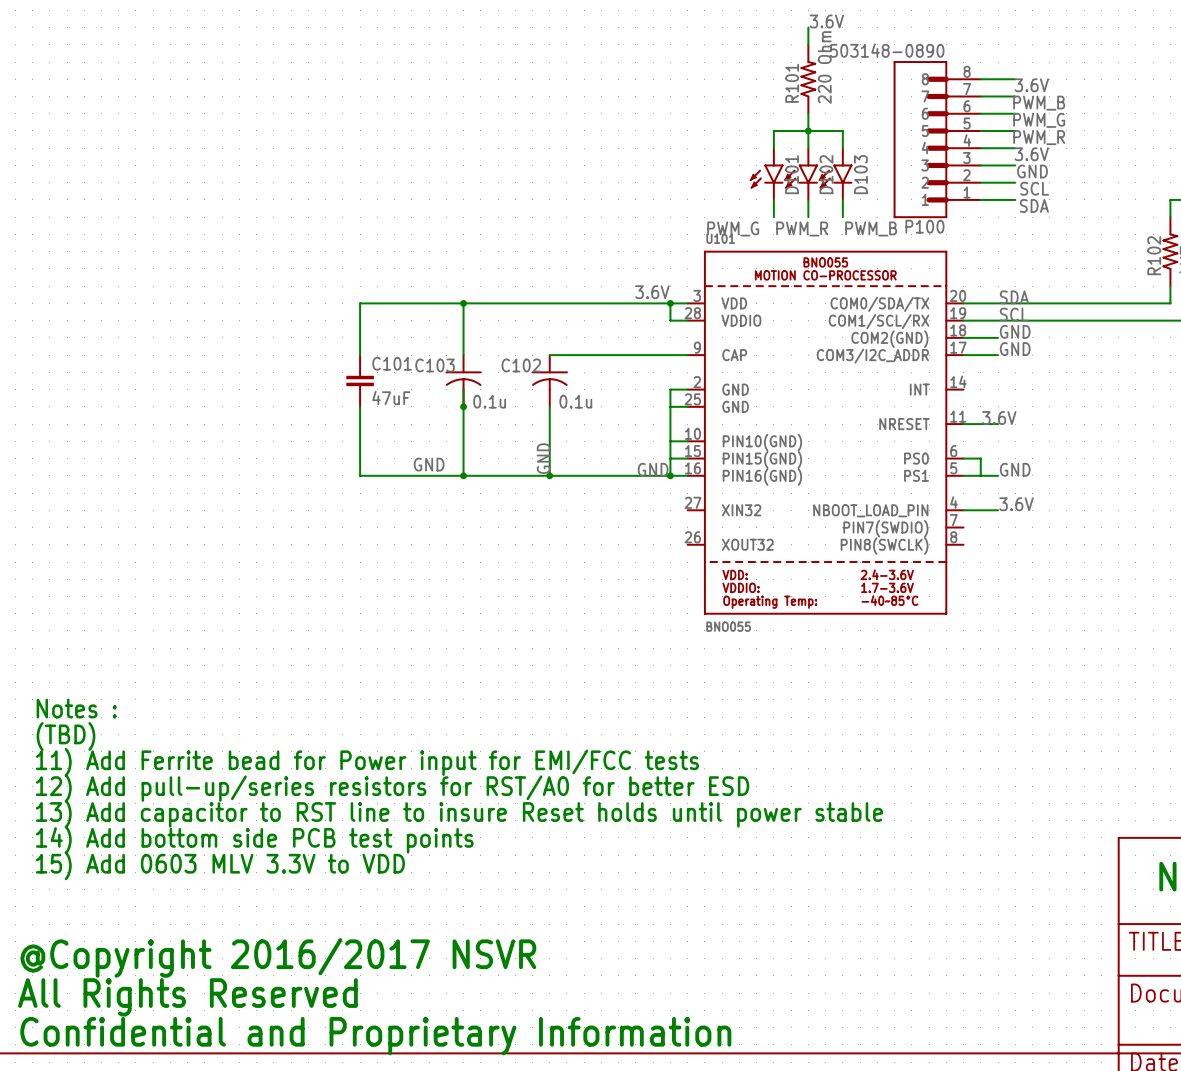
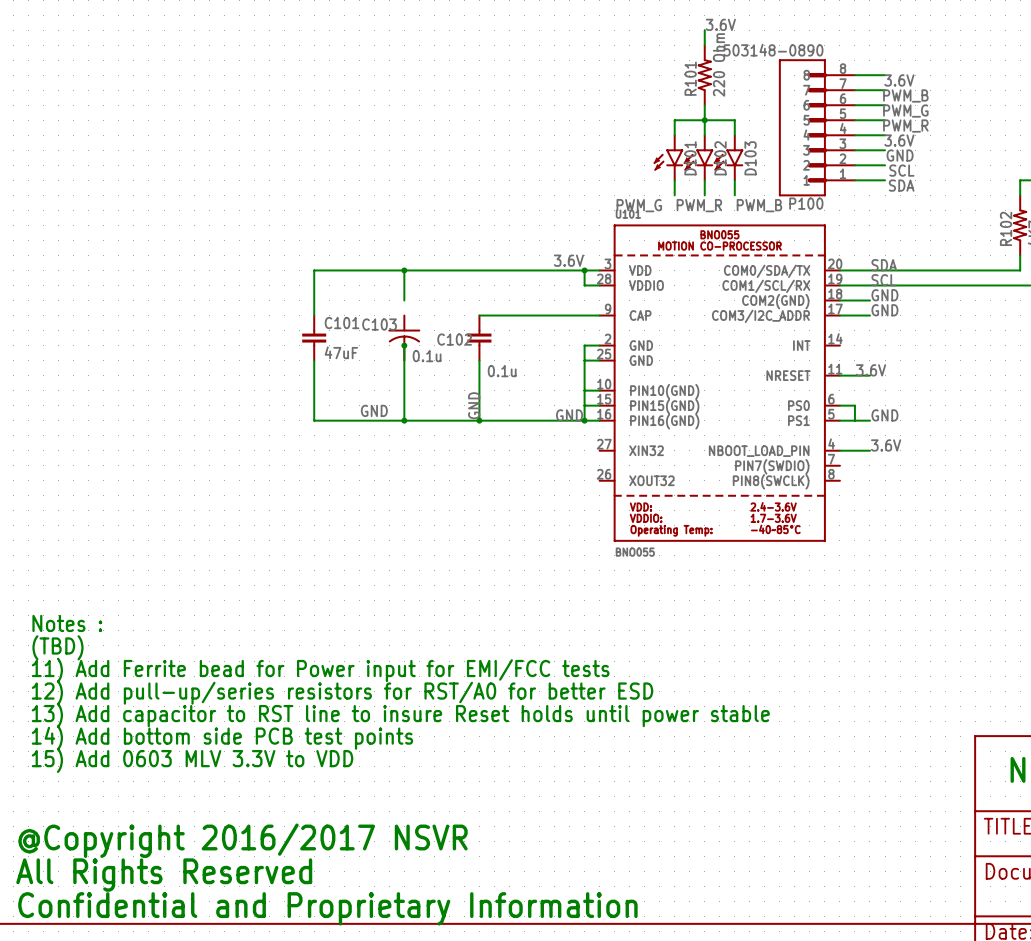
wire: (463, 337) (463, 355) -> none
C102 symbol: [531, 355, 568, 407] -> [467, 315, 492, 361]
C102 name position: C102 (521, 365) -> C102 (454, 339)
C102 value position: 0.1u (575, 401) -> 0.1u (502, 371)
junction position: (463, 406) -> (404, 345)

